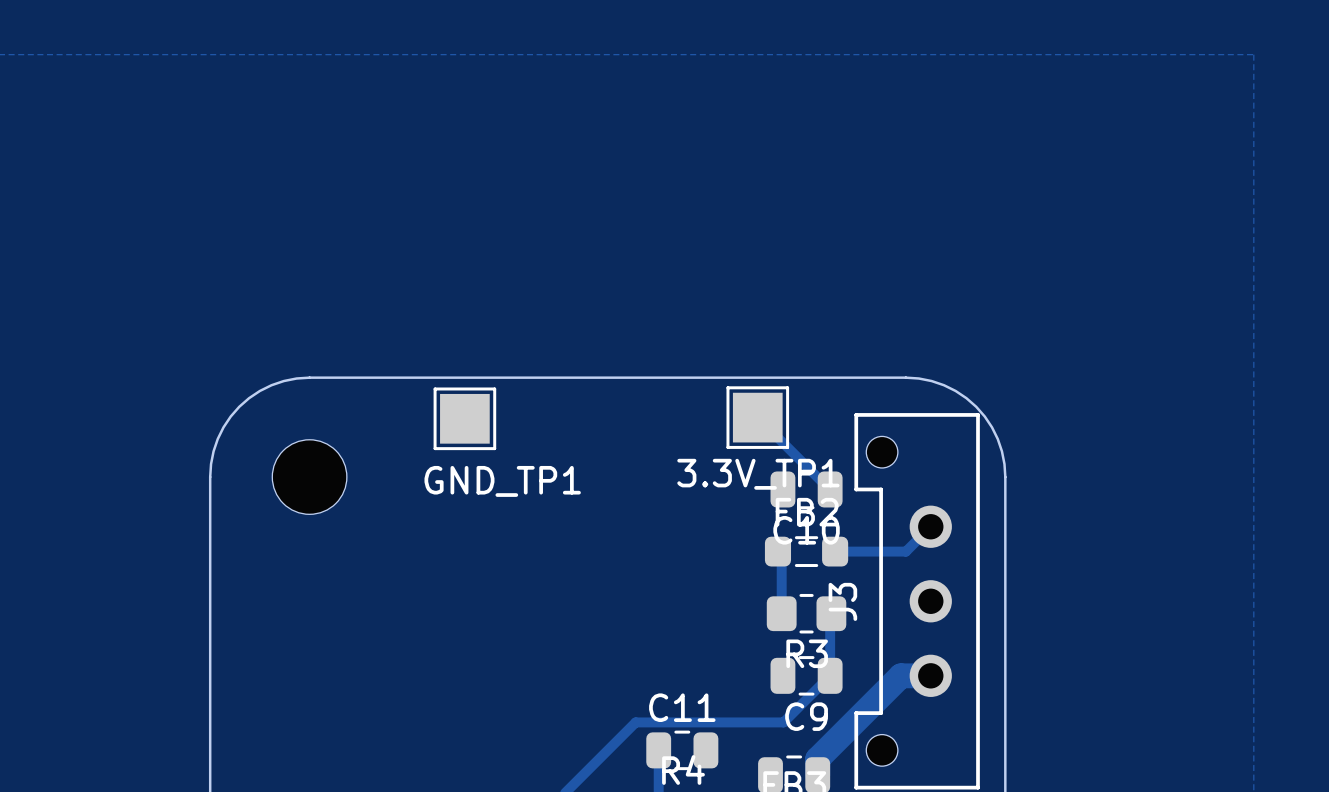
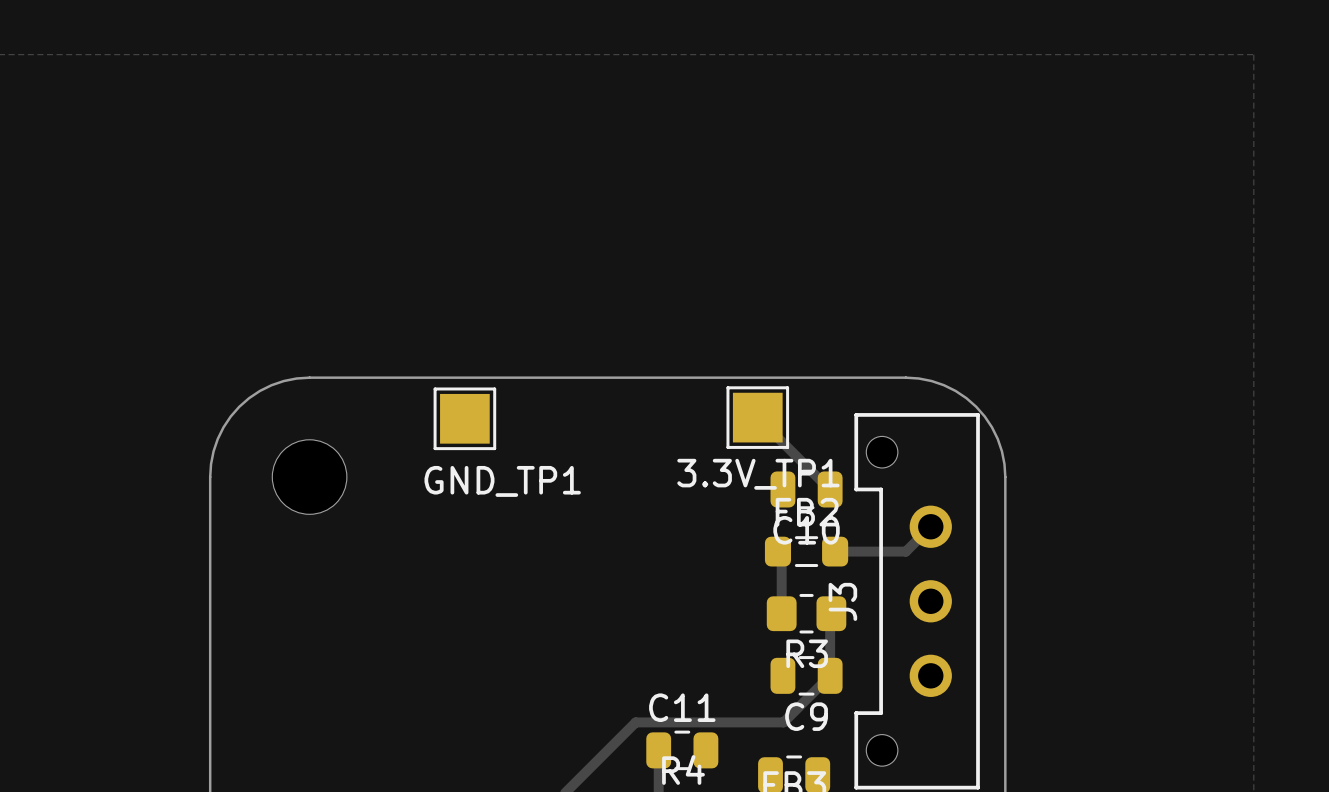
track: (930, 675) (900, 675) (817, 759) (817, 775) -> none

